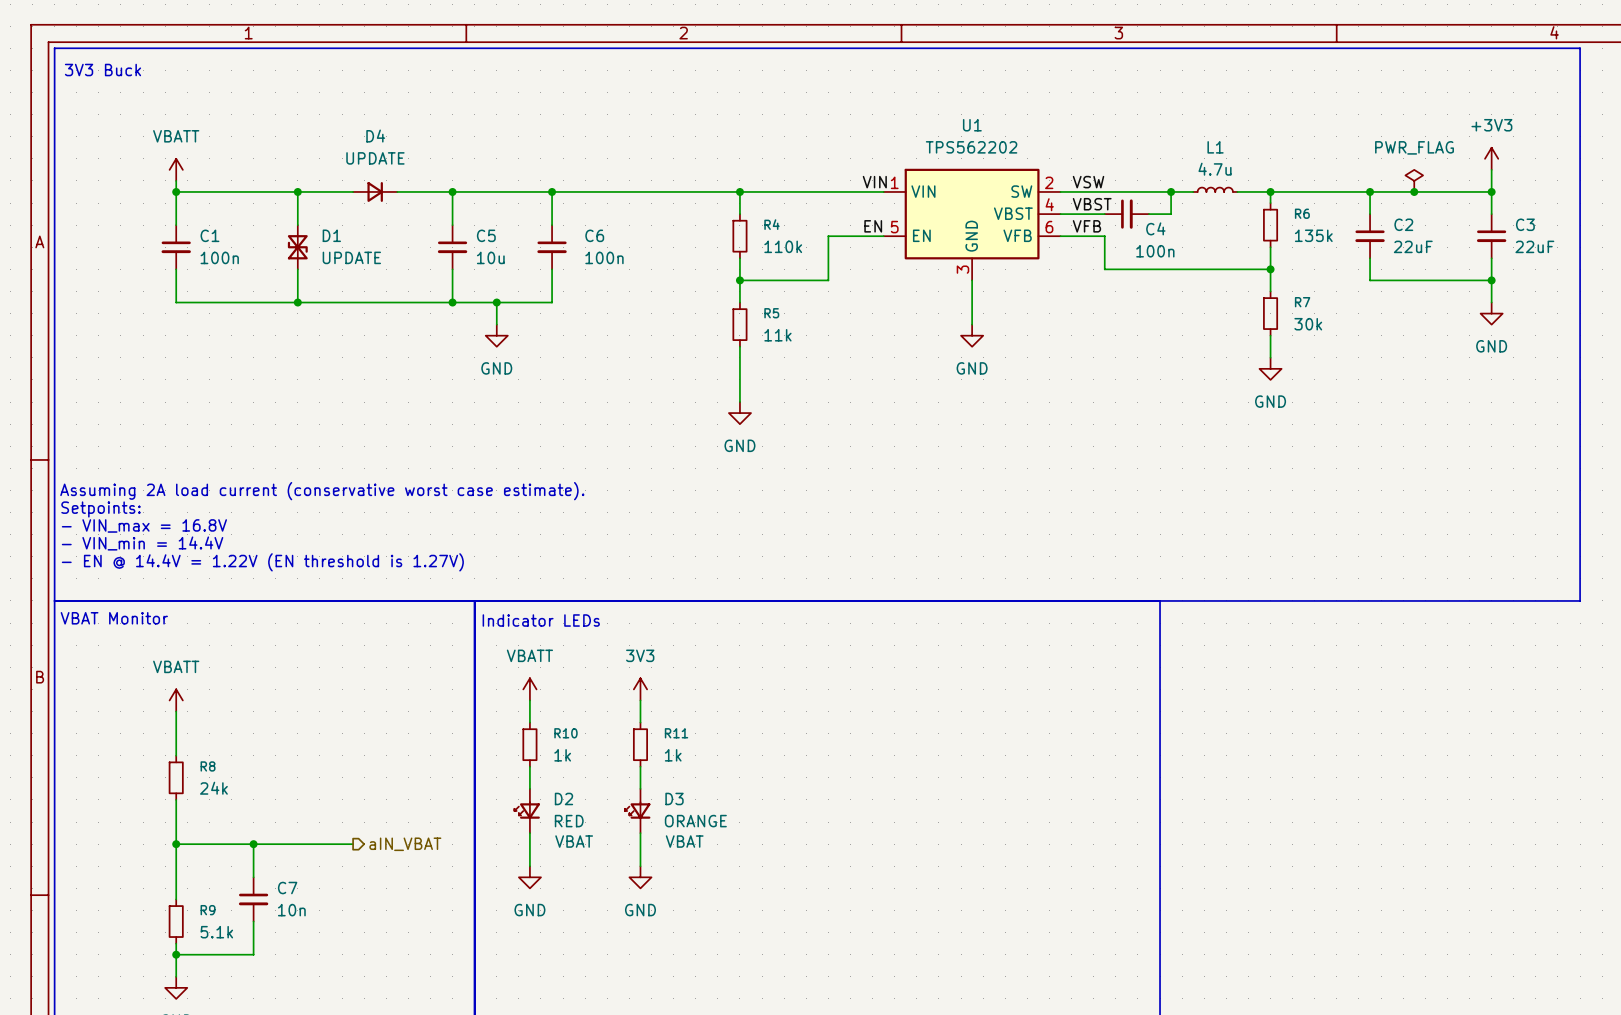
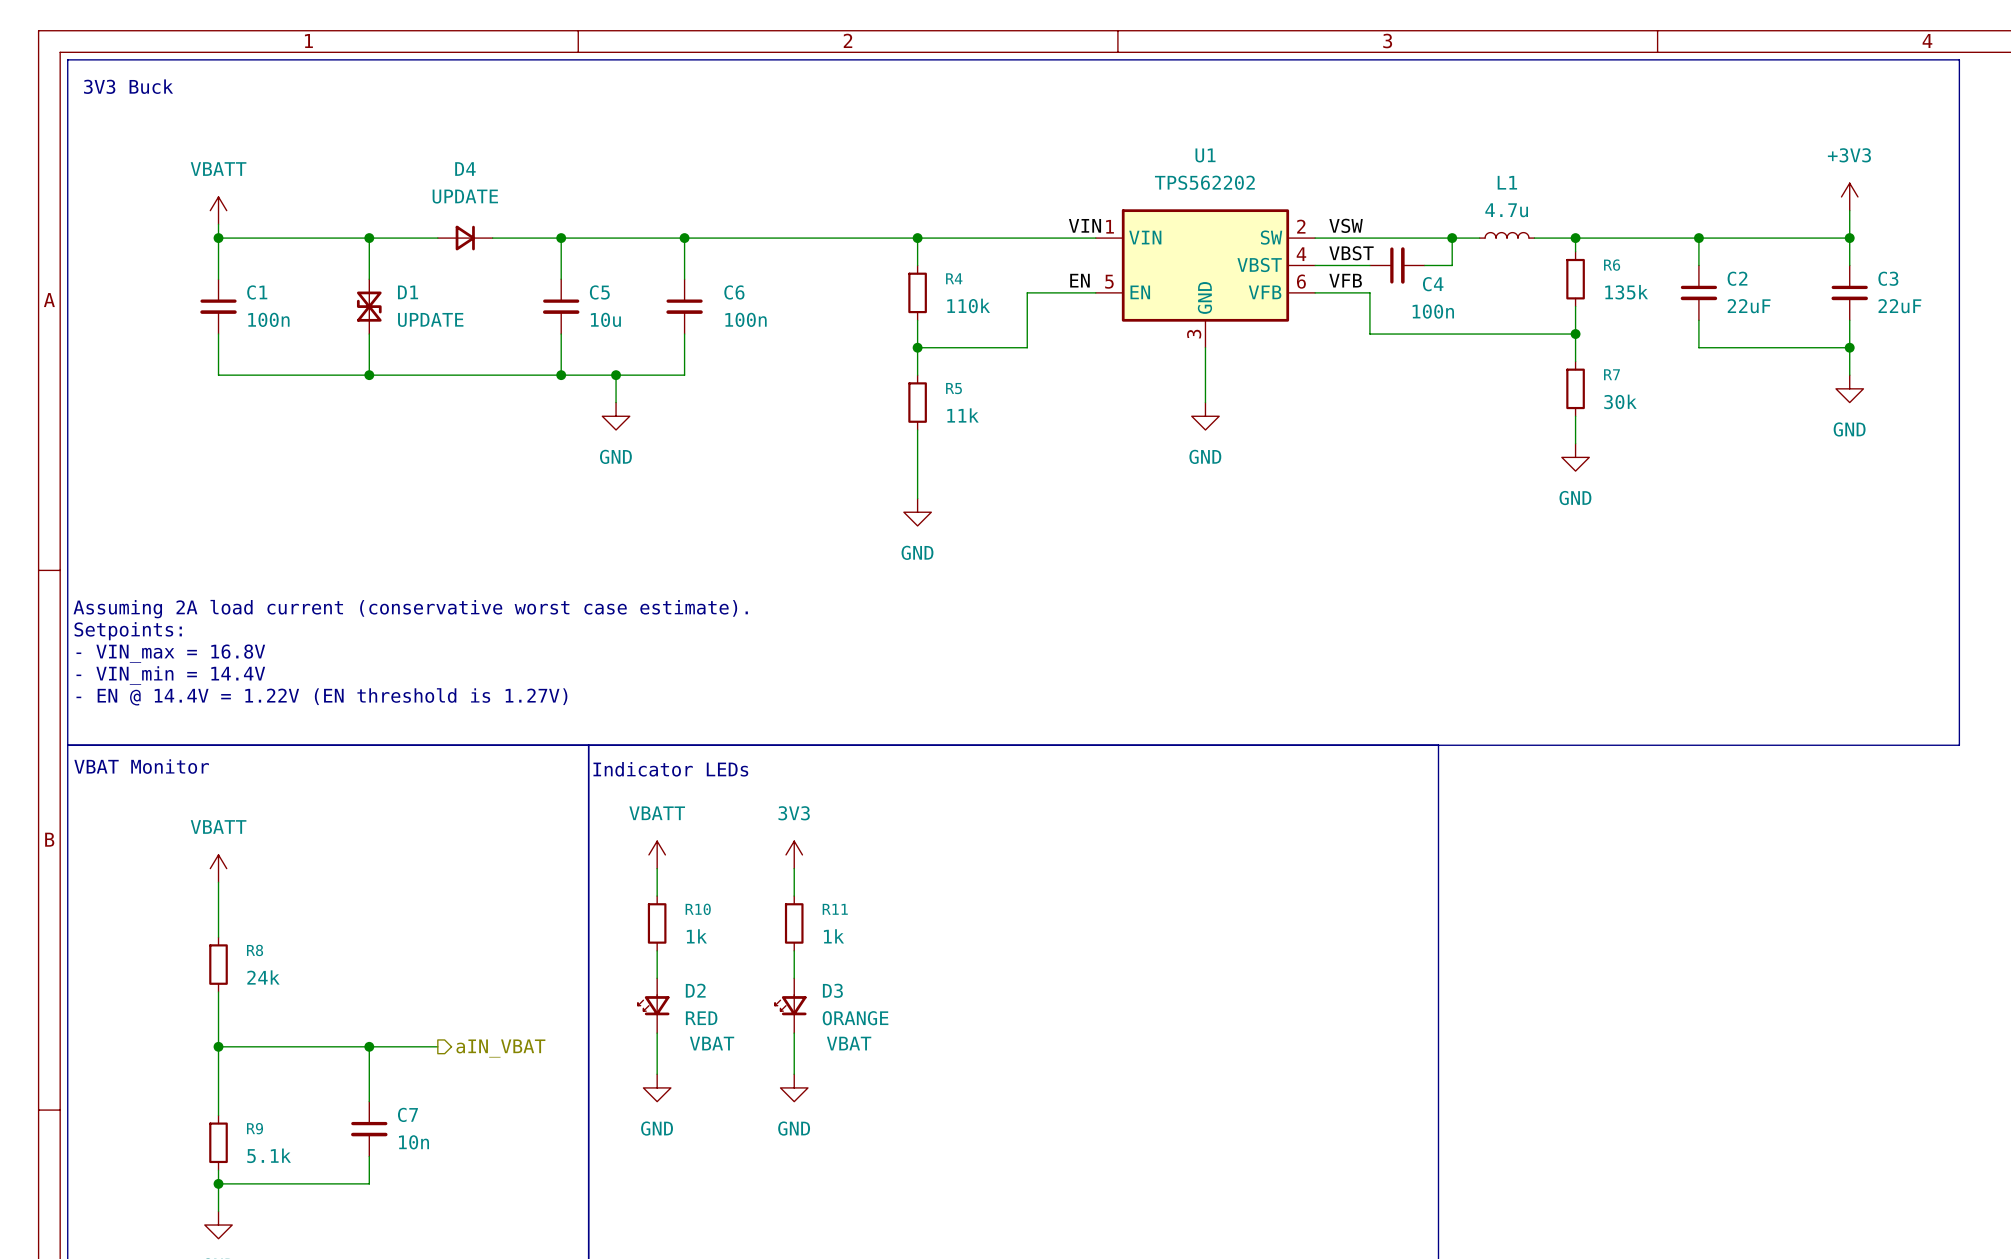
power symbol: PWR_FLAG (1414, 180) -> none
junction: (1414, 191) -> none
wire: (253, 844) (253, 877) -> none
junction position: (253, 844) -> (369, 1046)
wire: none -> (369, 1046) (369, 1101)
C7 position: (253, 899) -> (369, 1129)
wire: (253, 921) (253, 954) -> (369, 1156) (369, 1183) (314, 1183)

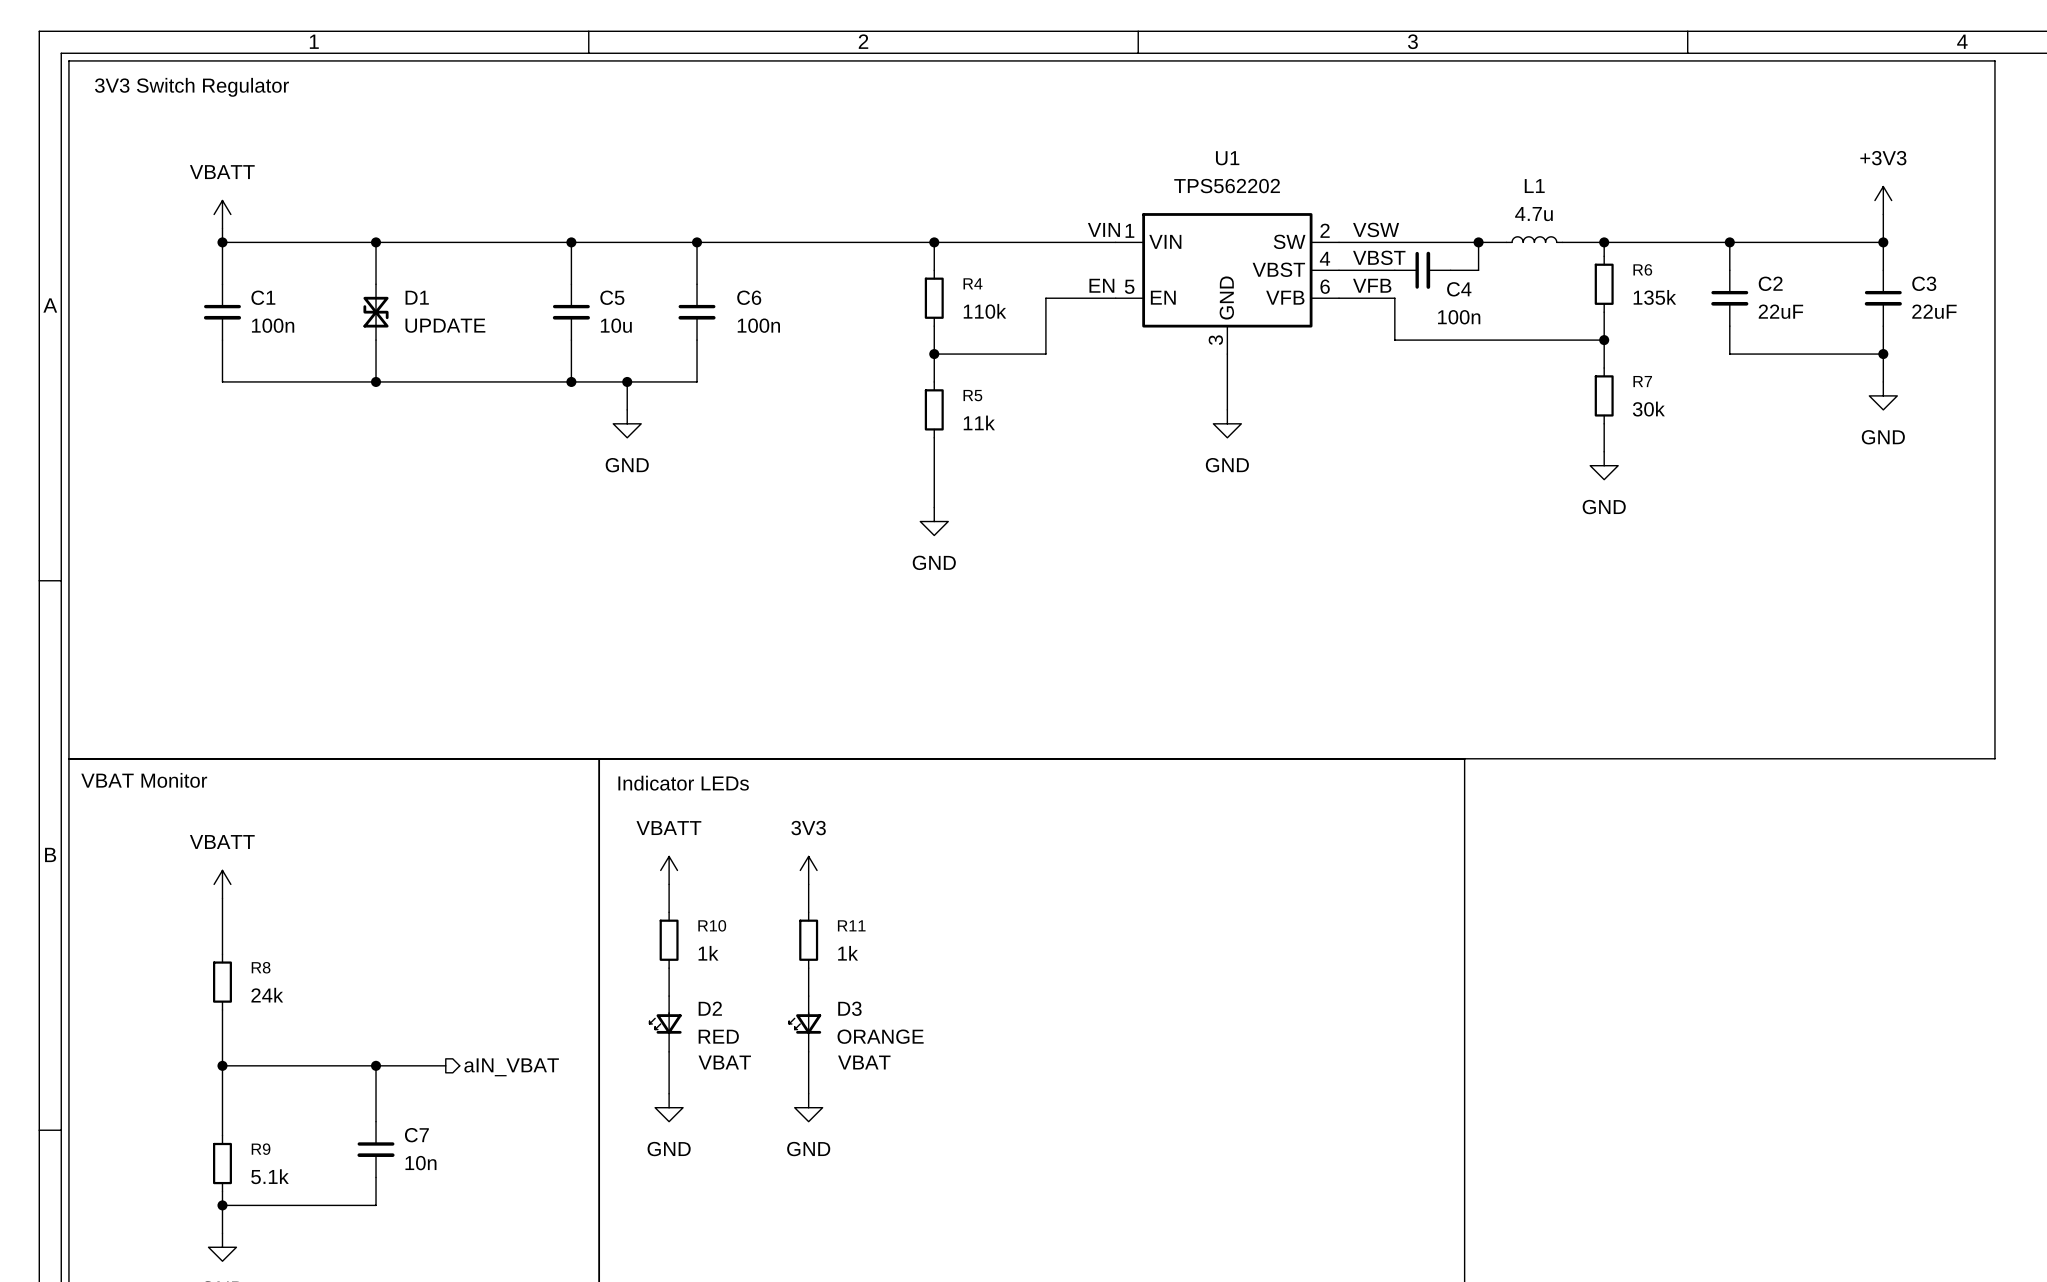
text: none -> 3V3 Switch Regulator (192, 87)
text: 3V3 Buck (128, 86) -> none
D4: UPDATE (465, 238) -> none
text: Assuming 2A load current (conservative worst case estimate). (410, 609) -> none
text: Setpoints: (128, 631) -> none
text: - VIN_max = 16.8V (170, 653) -> none
text: - VIN_min = 14.4V (170, 675) -> none
text: - EN @ 14.4V = 1.22V (EN threshold is 1.27V) (321, 696) -> none

